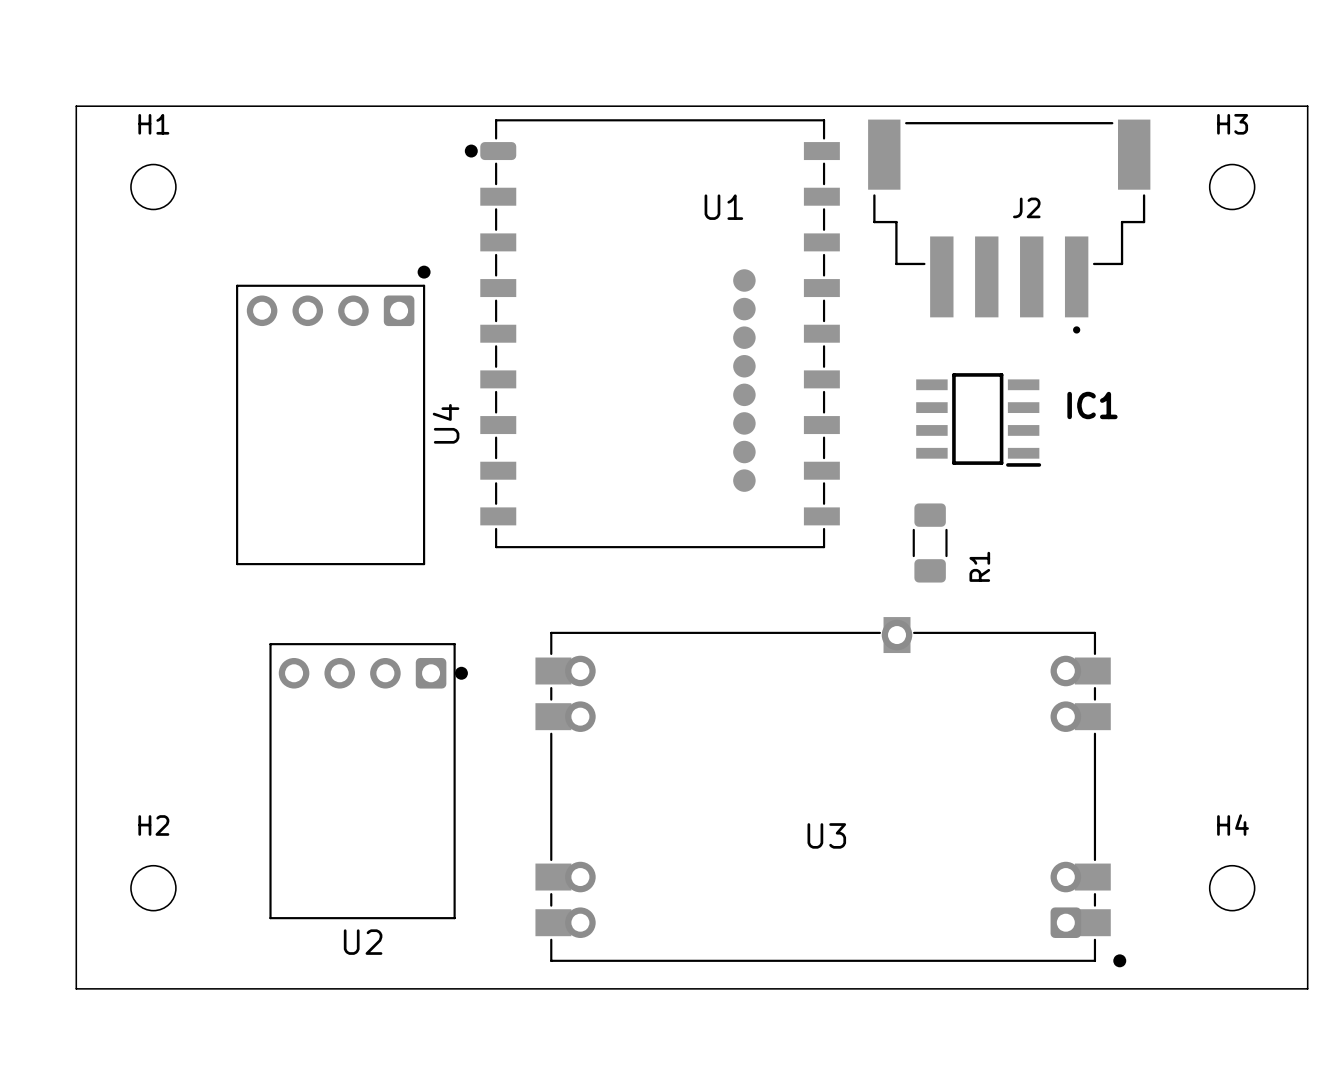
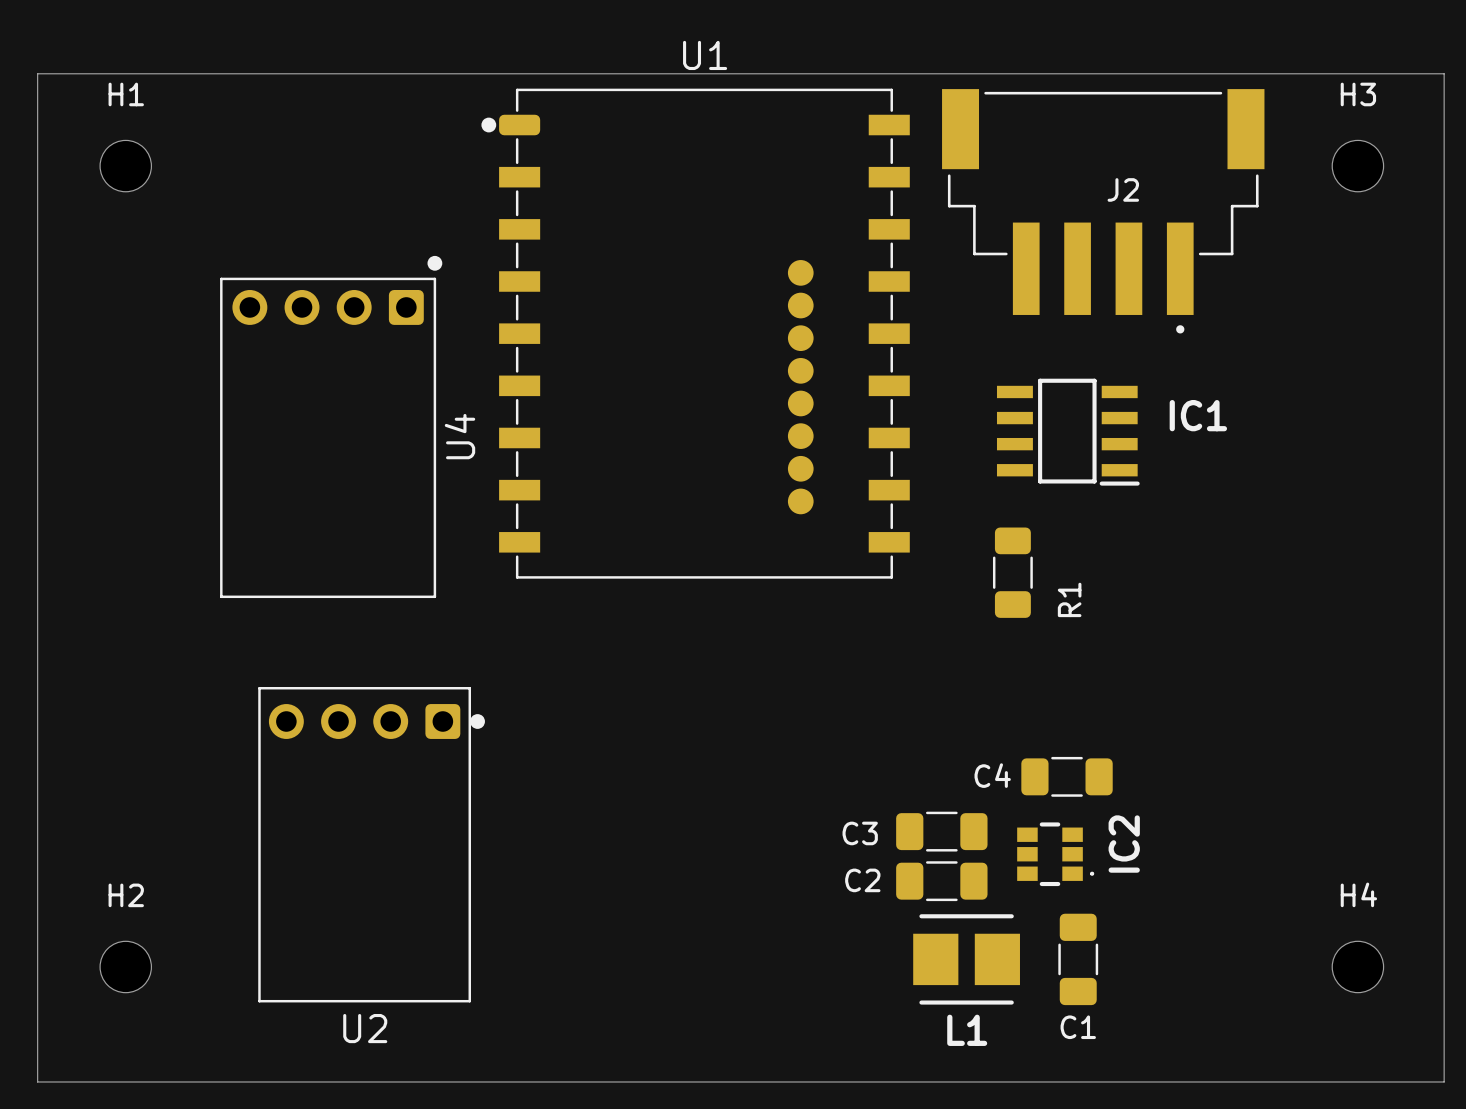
U1 name position: U1 (723, 207) -> U1 (705, 55)
C4: none -> (1067, 776)
C3: none -> (941, 831)
IC2: none -> (1055, 854)
U3: (830, 792) -> none
C2: none -> (941, 881)
L1: none -> (966, 959)
C1: none -> (1078, 959)

